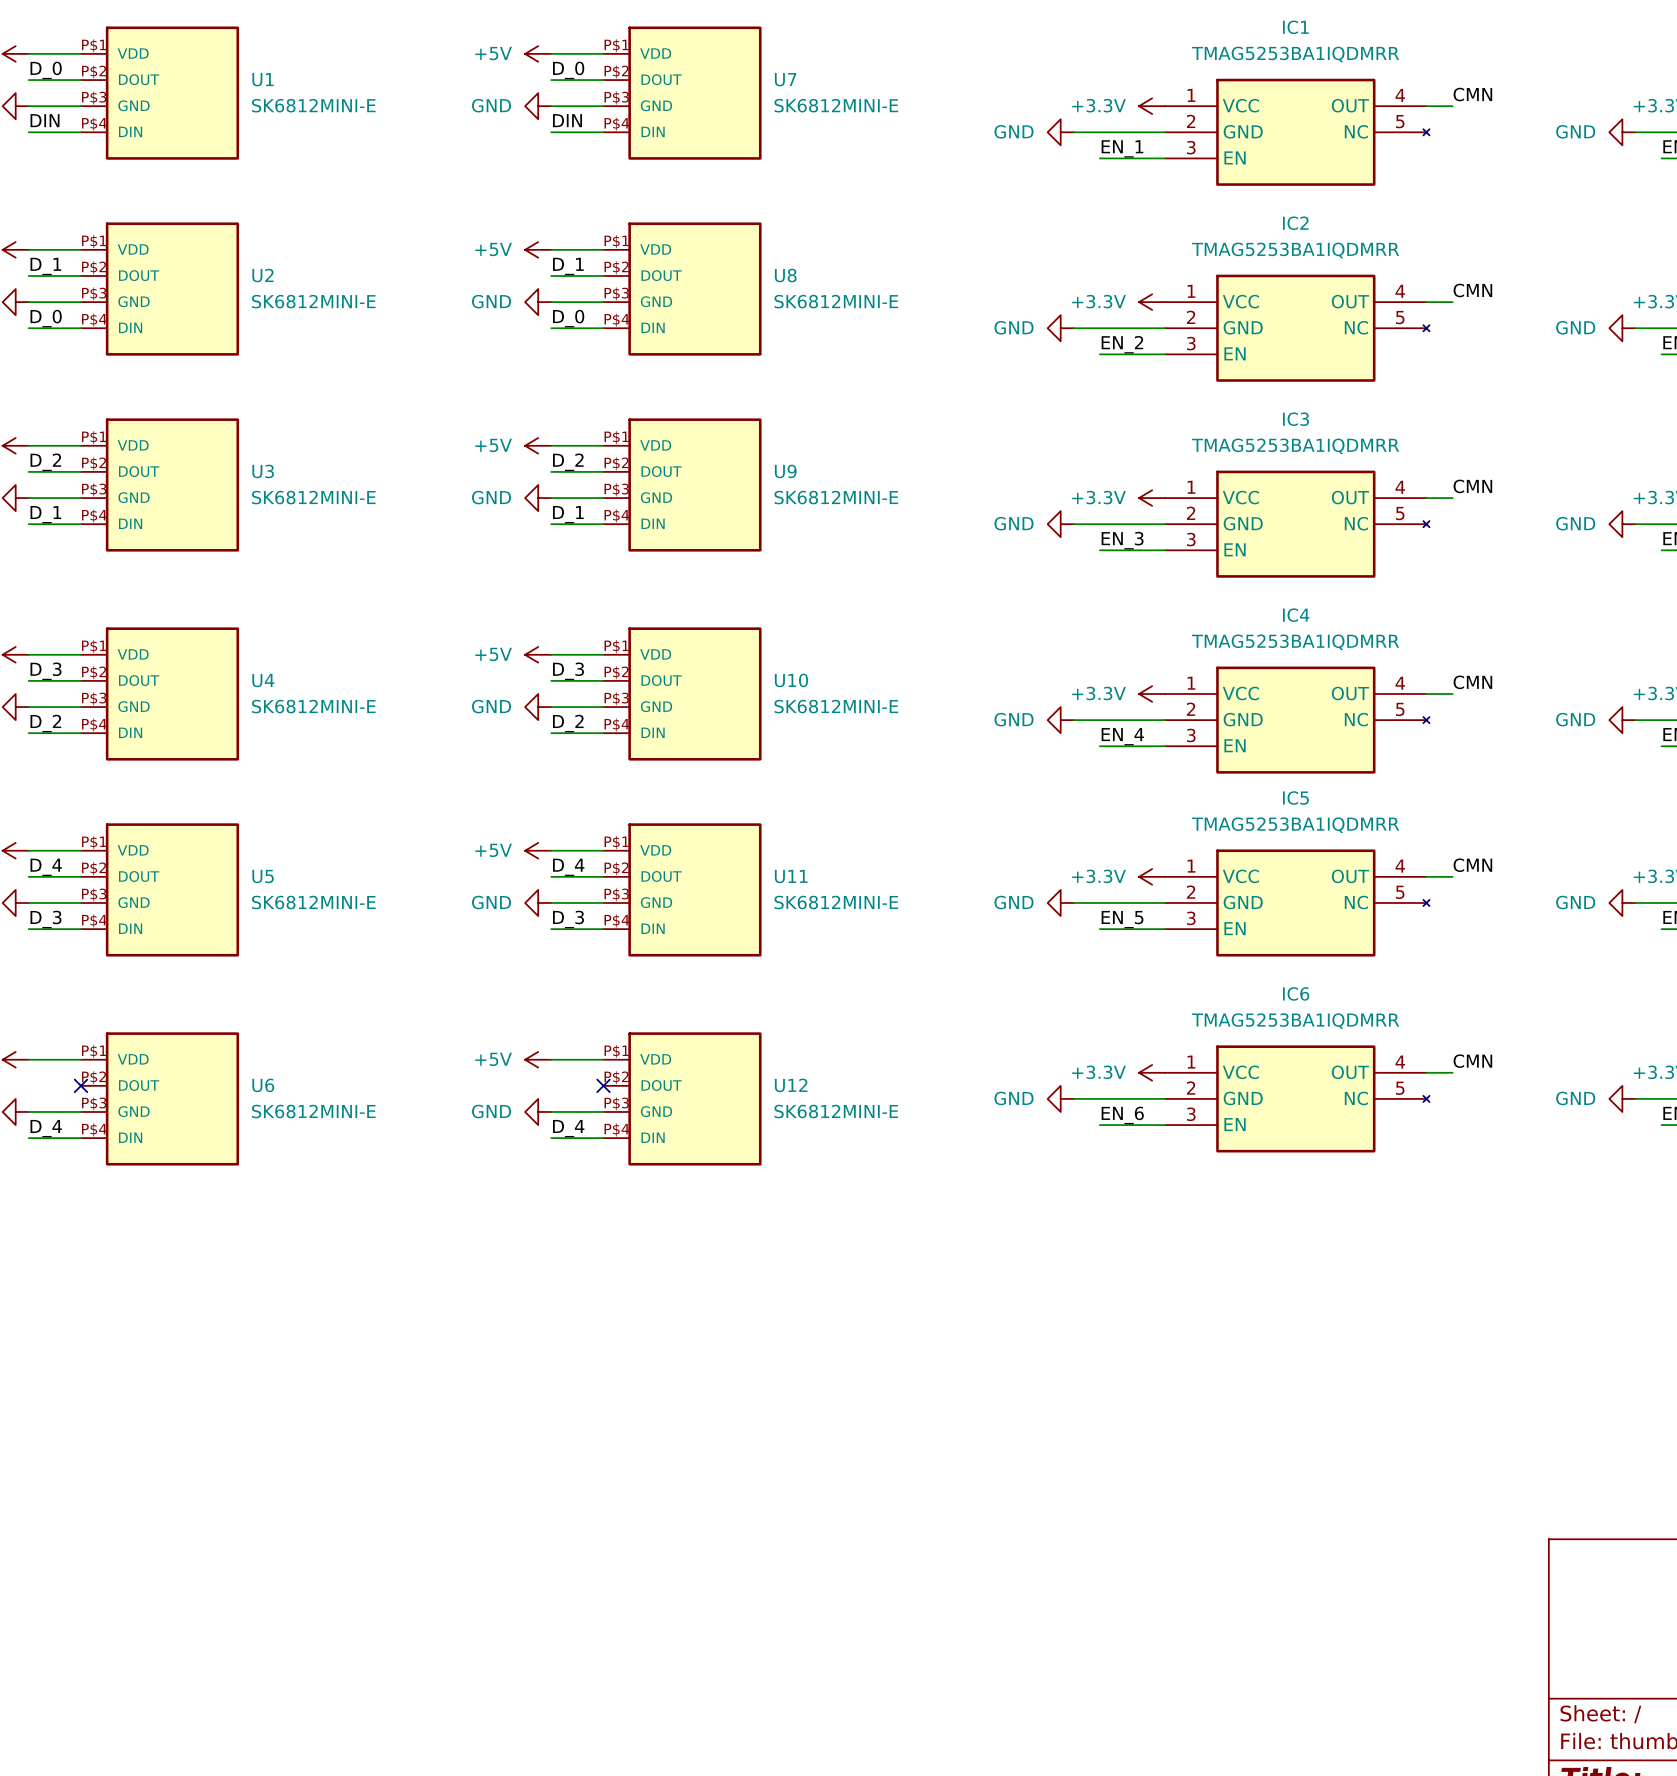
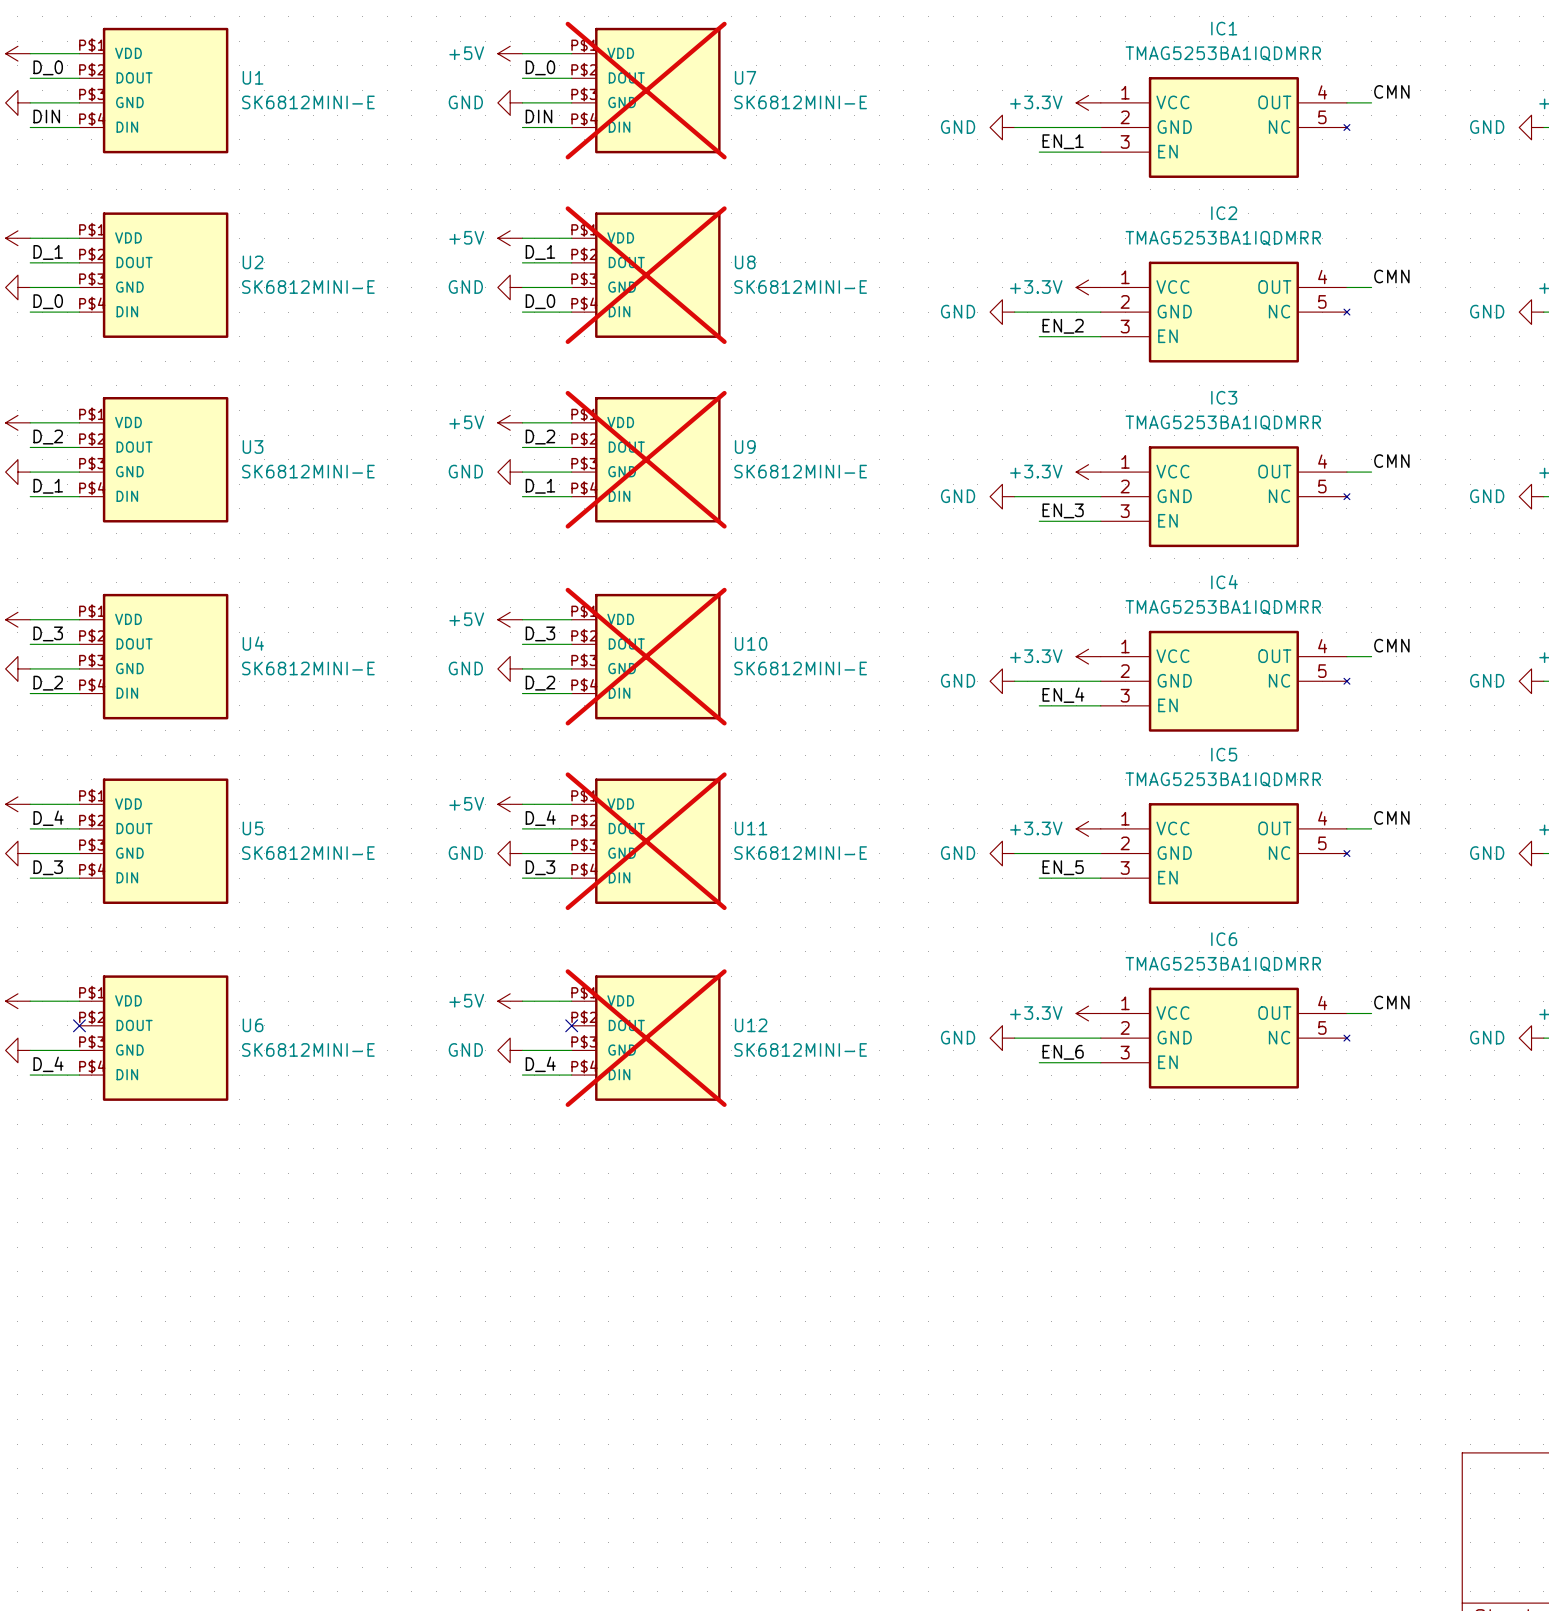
U7 do-not-place cross: none -> (646, 90)
U8 do-not-place cross: none -> (646, 275)
U9 do-not-place cross: none -> (646, 459)
U10 do-not-place cross: none -> (646, 656)
U11 do-not-place cross: none -> (646, 841)
U12 do-not-place cross: none -> (646, 1038)

